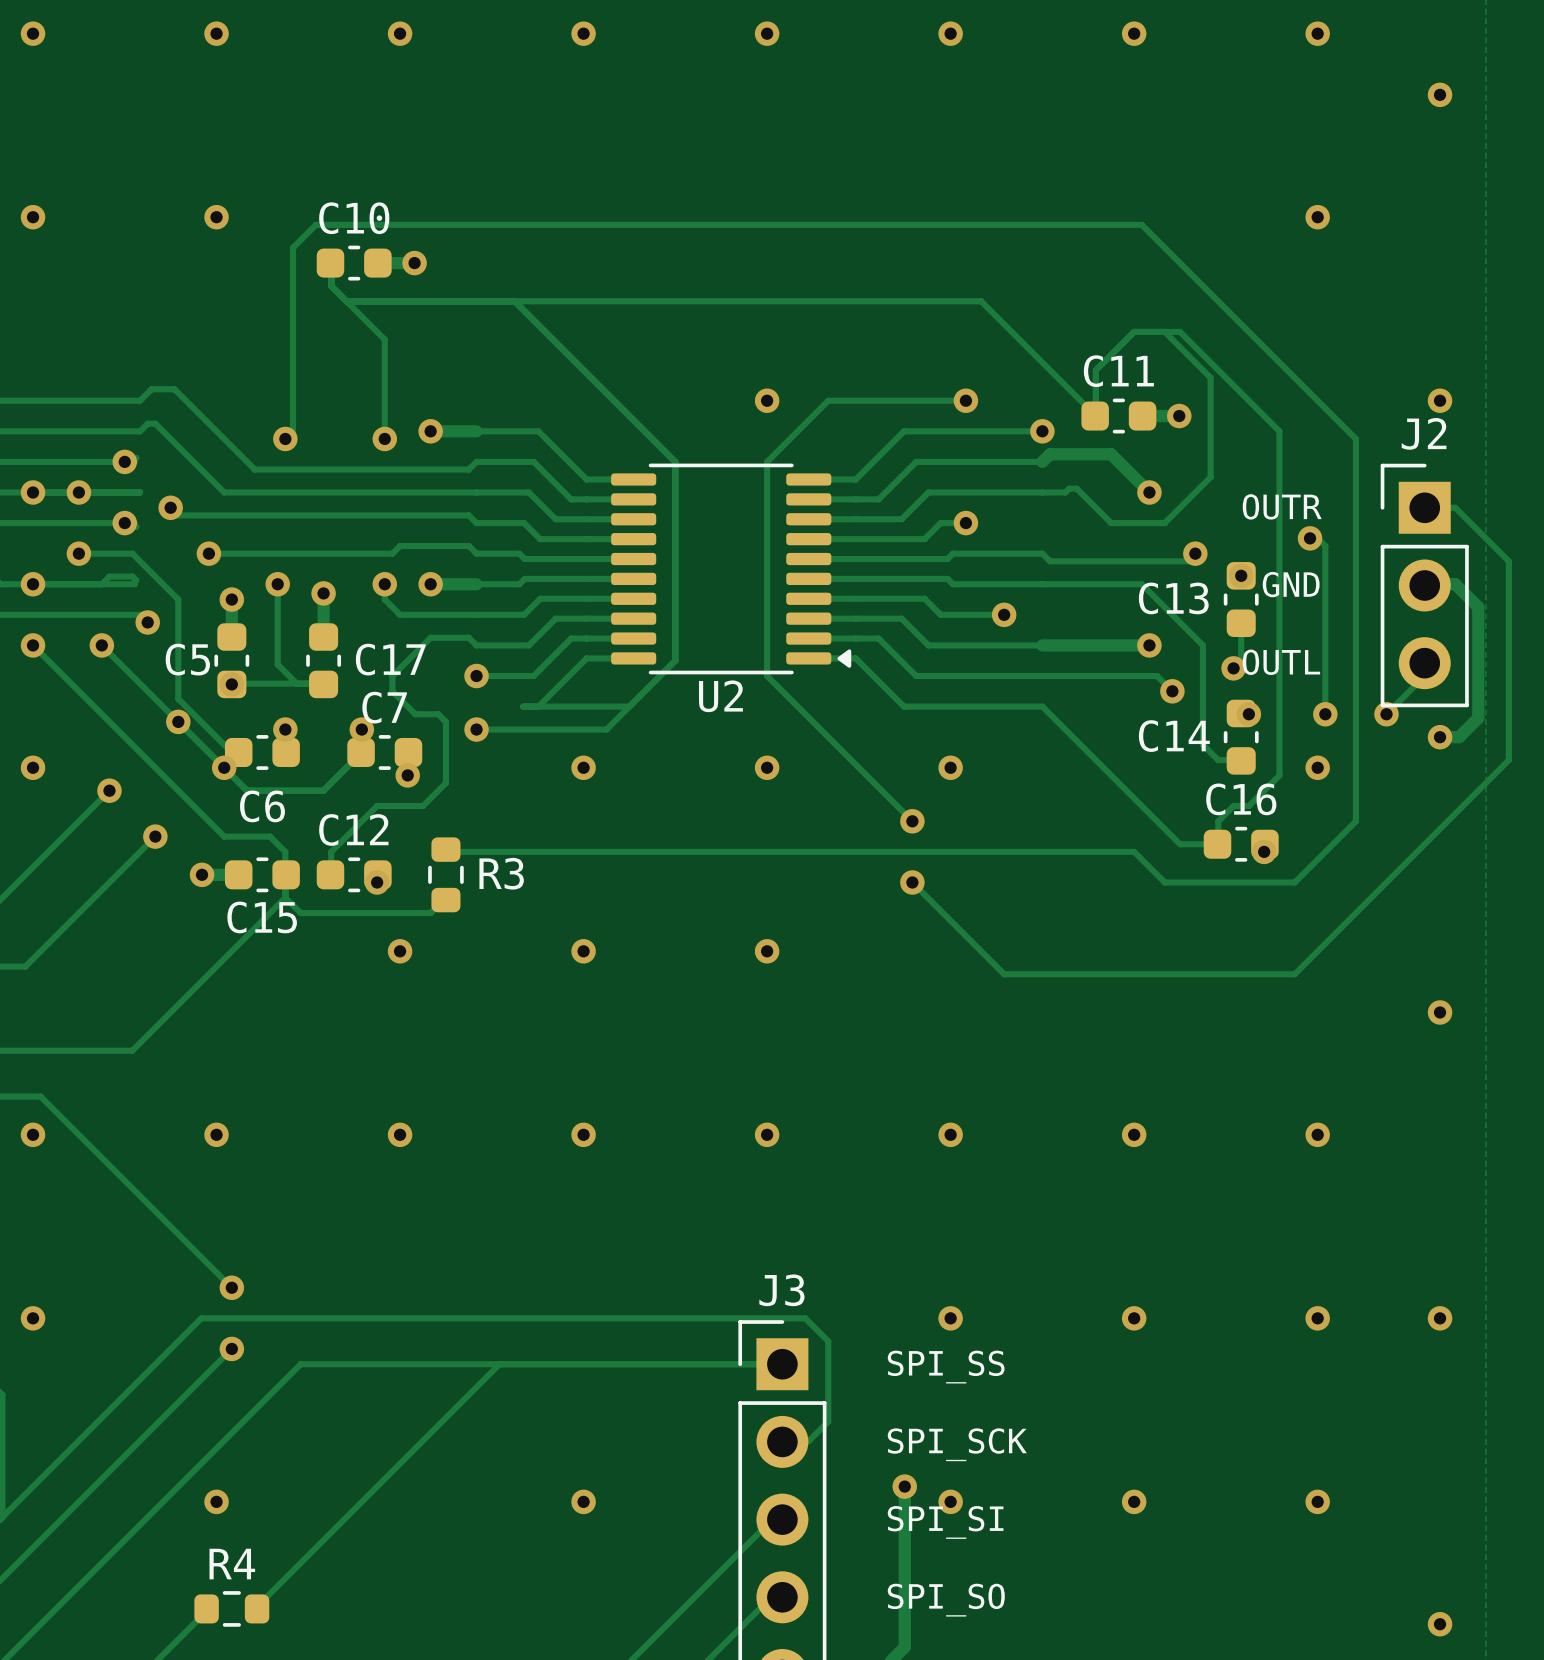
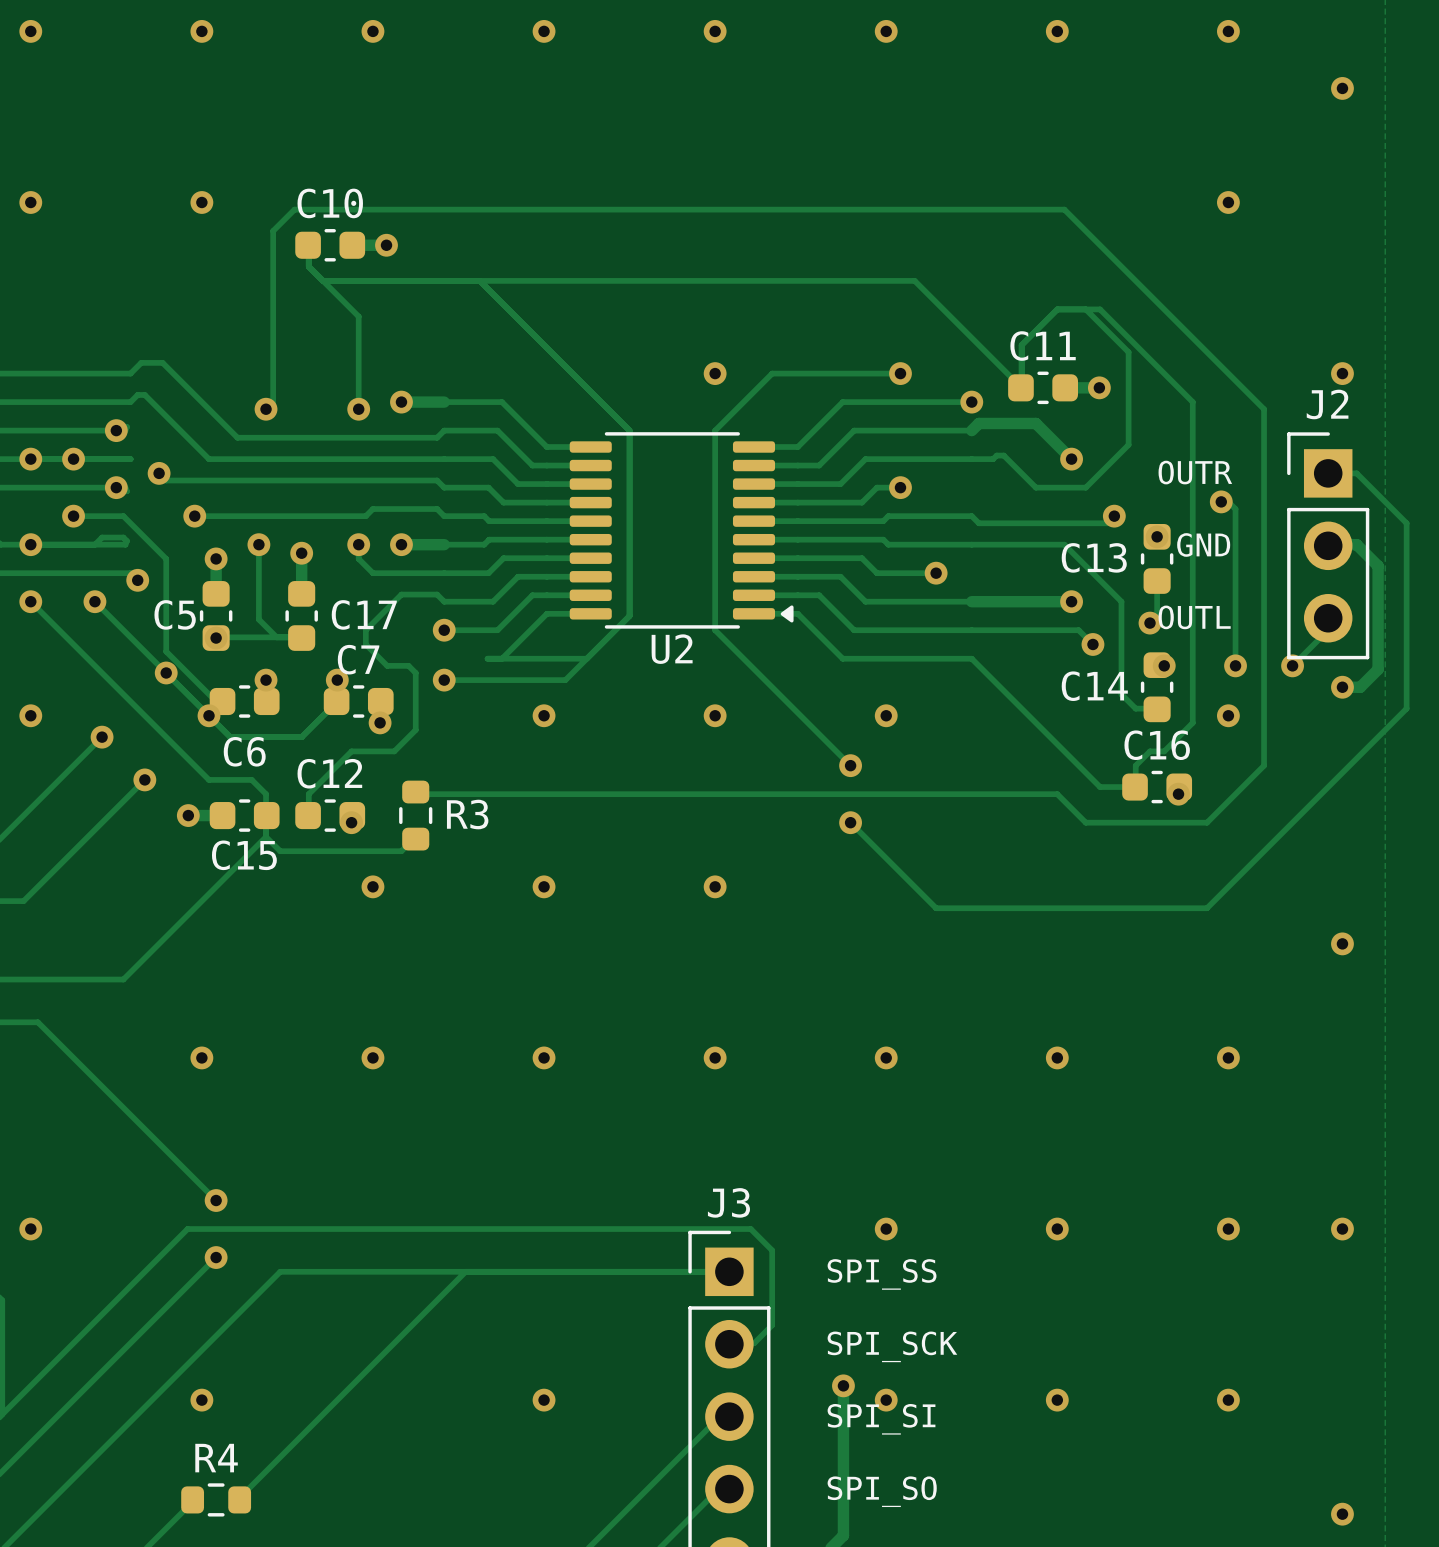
via: (33, 1134) -> none

